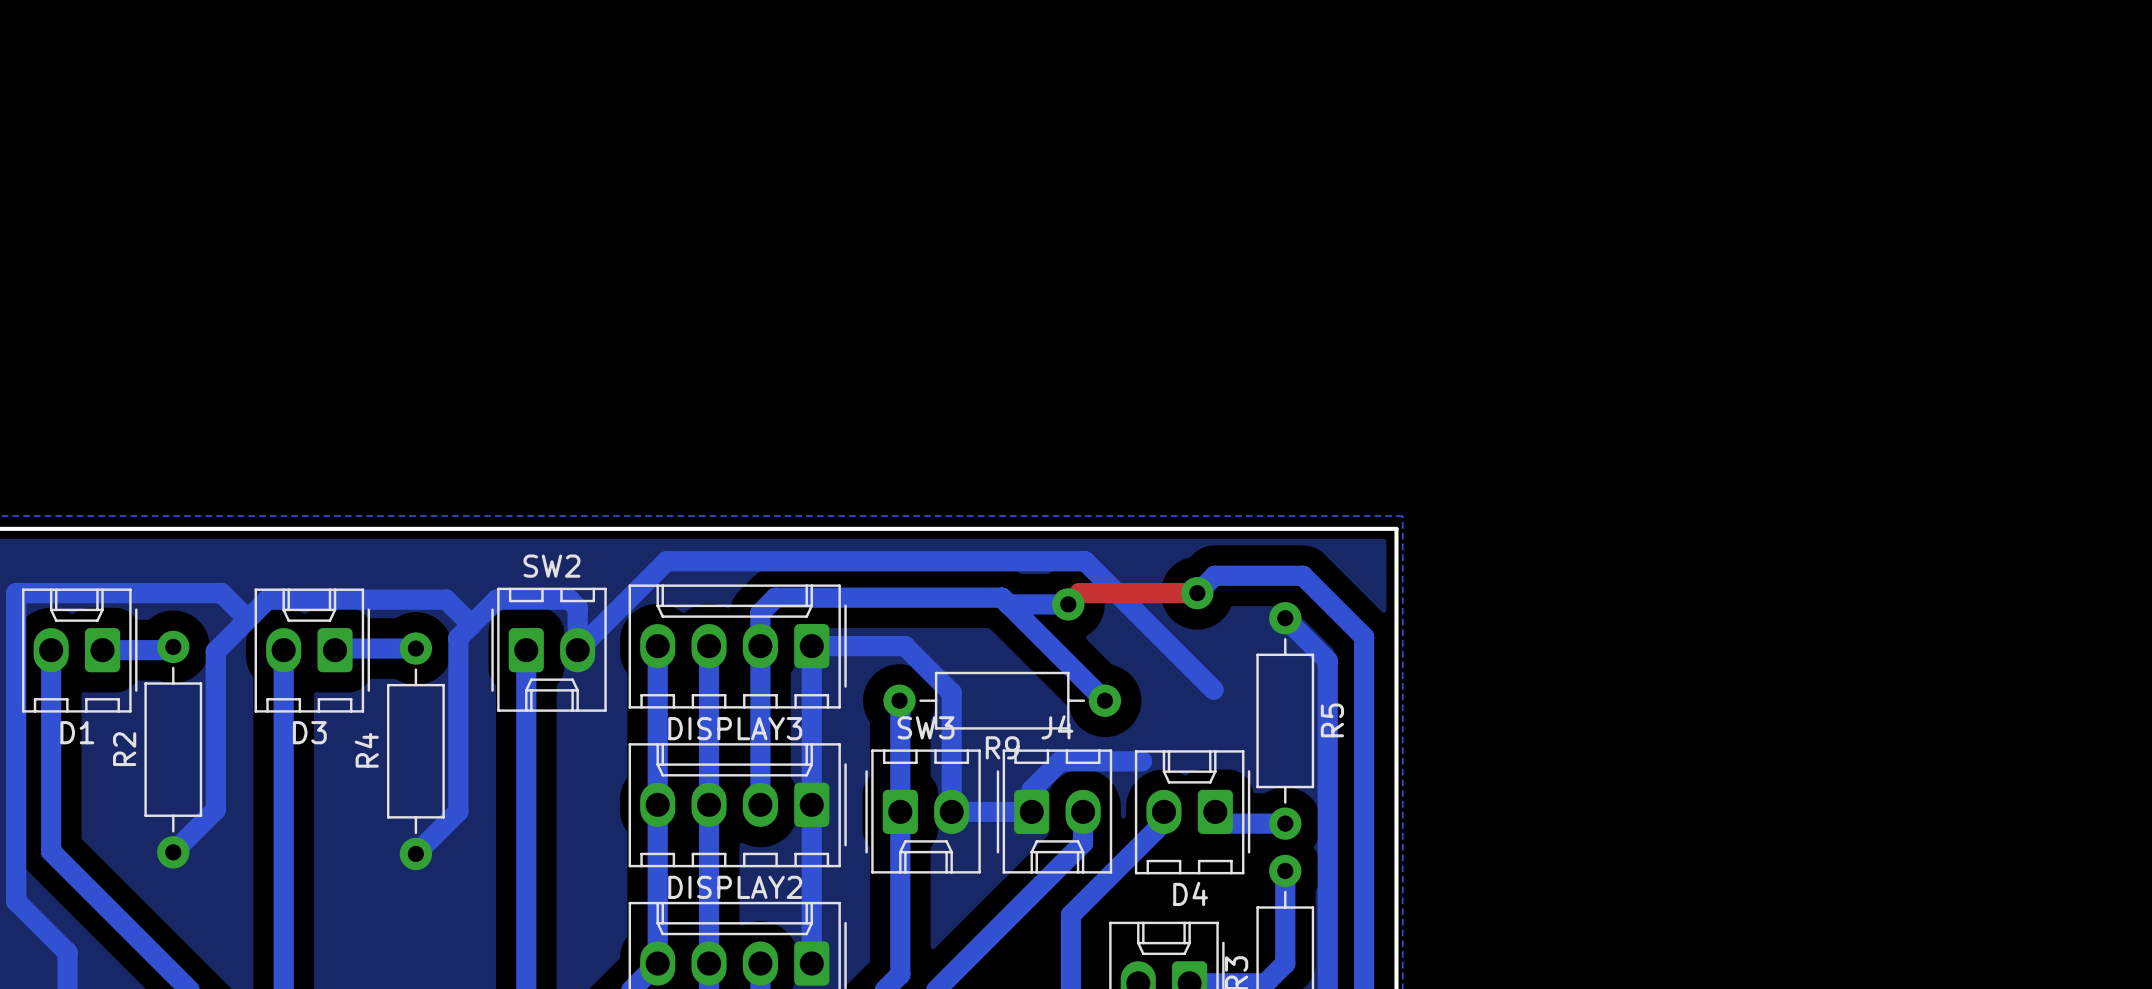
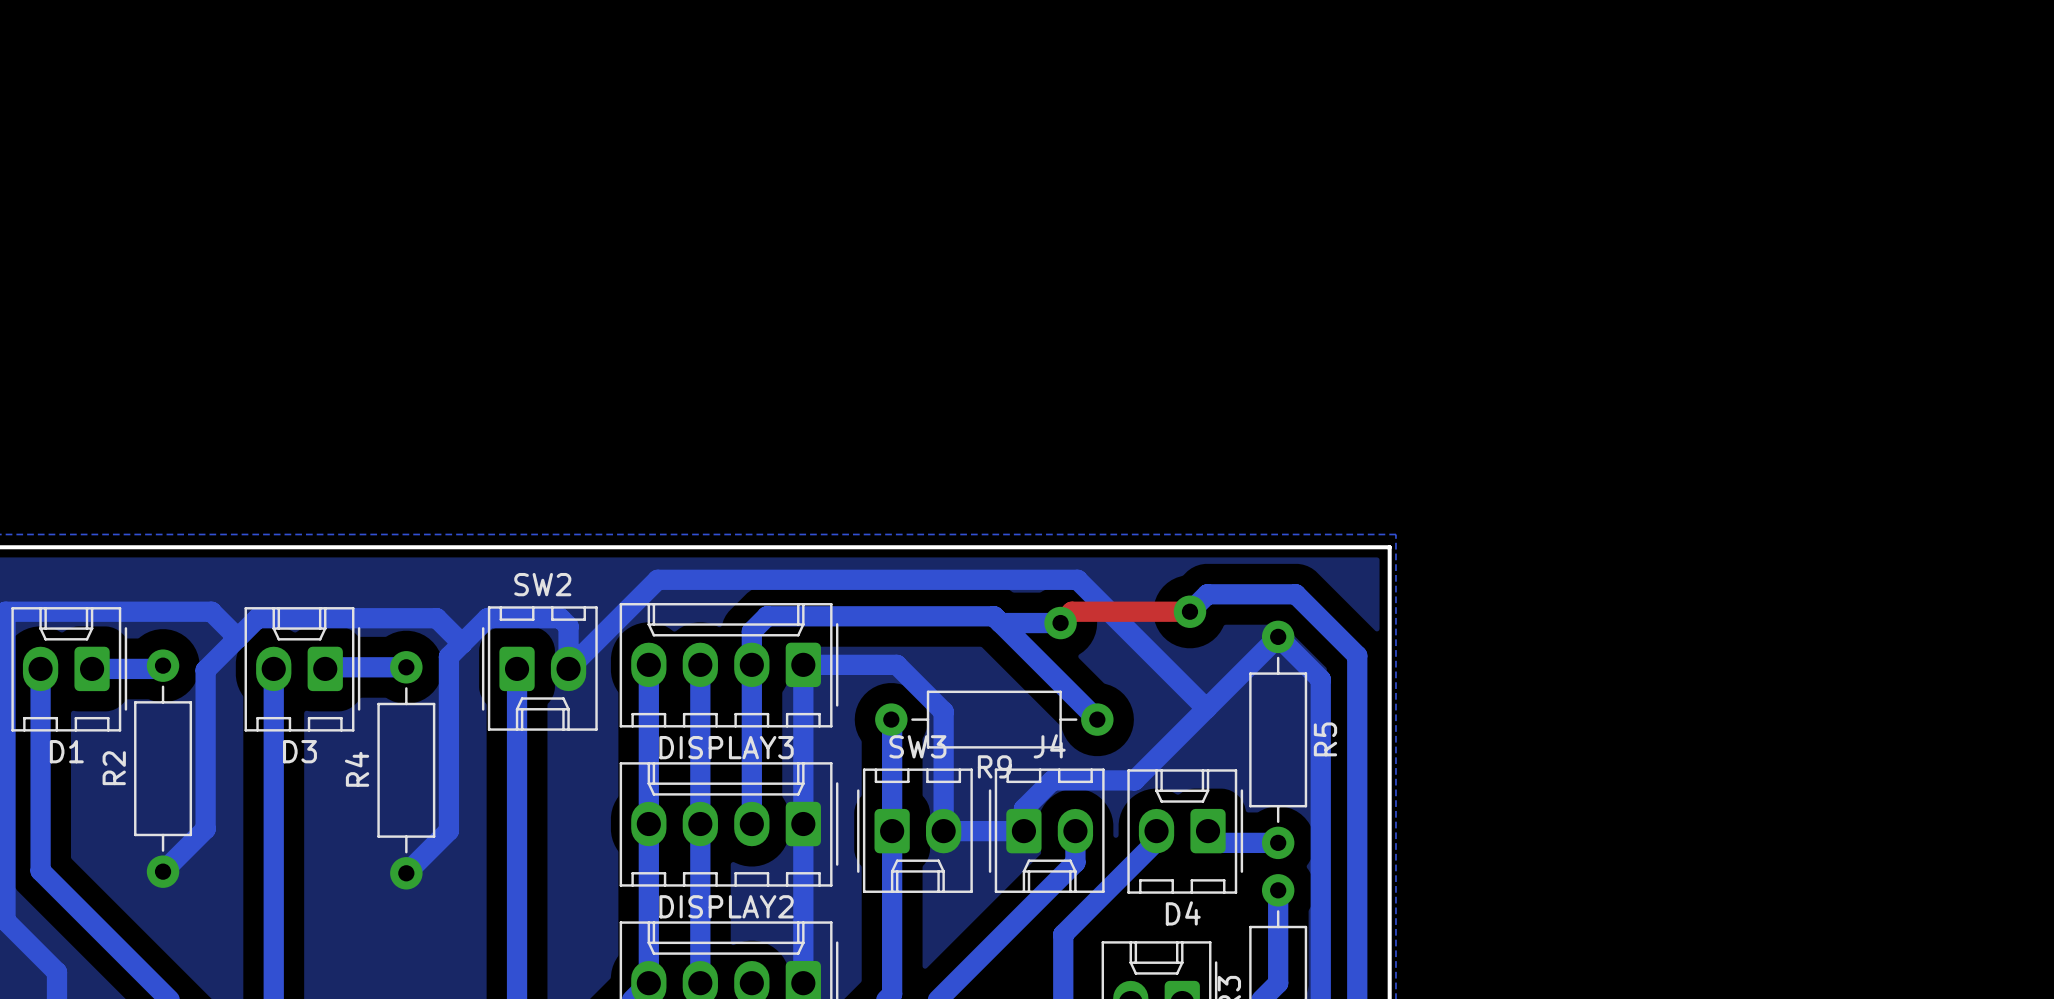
bottom track: none -> (1278, 636) (1134, 780)

